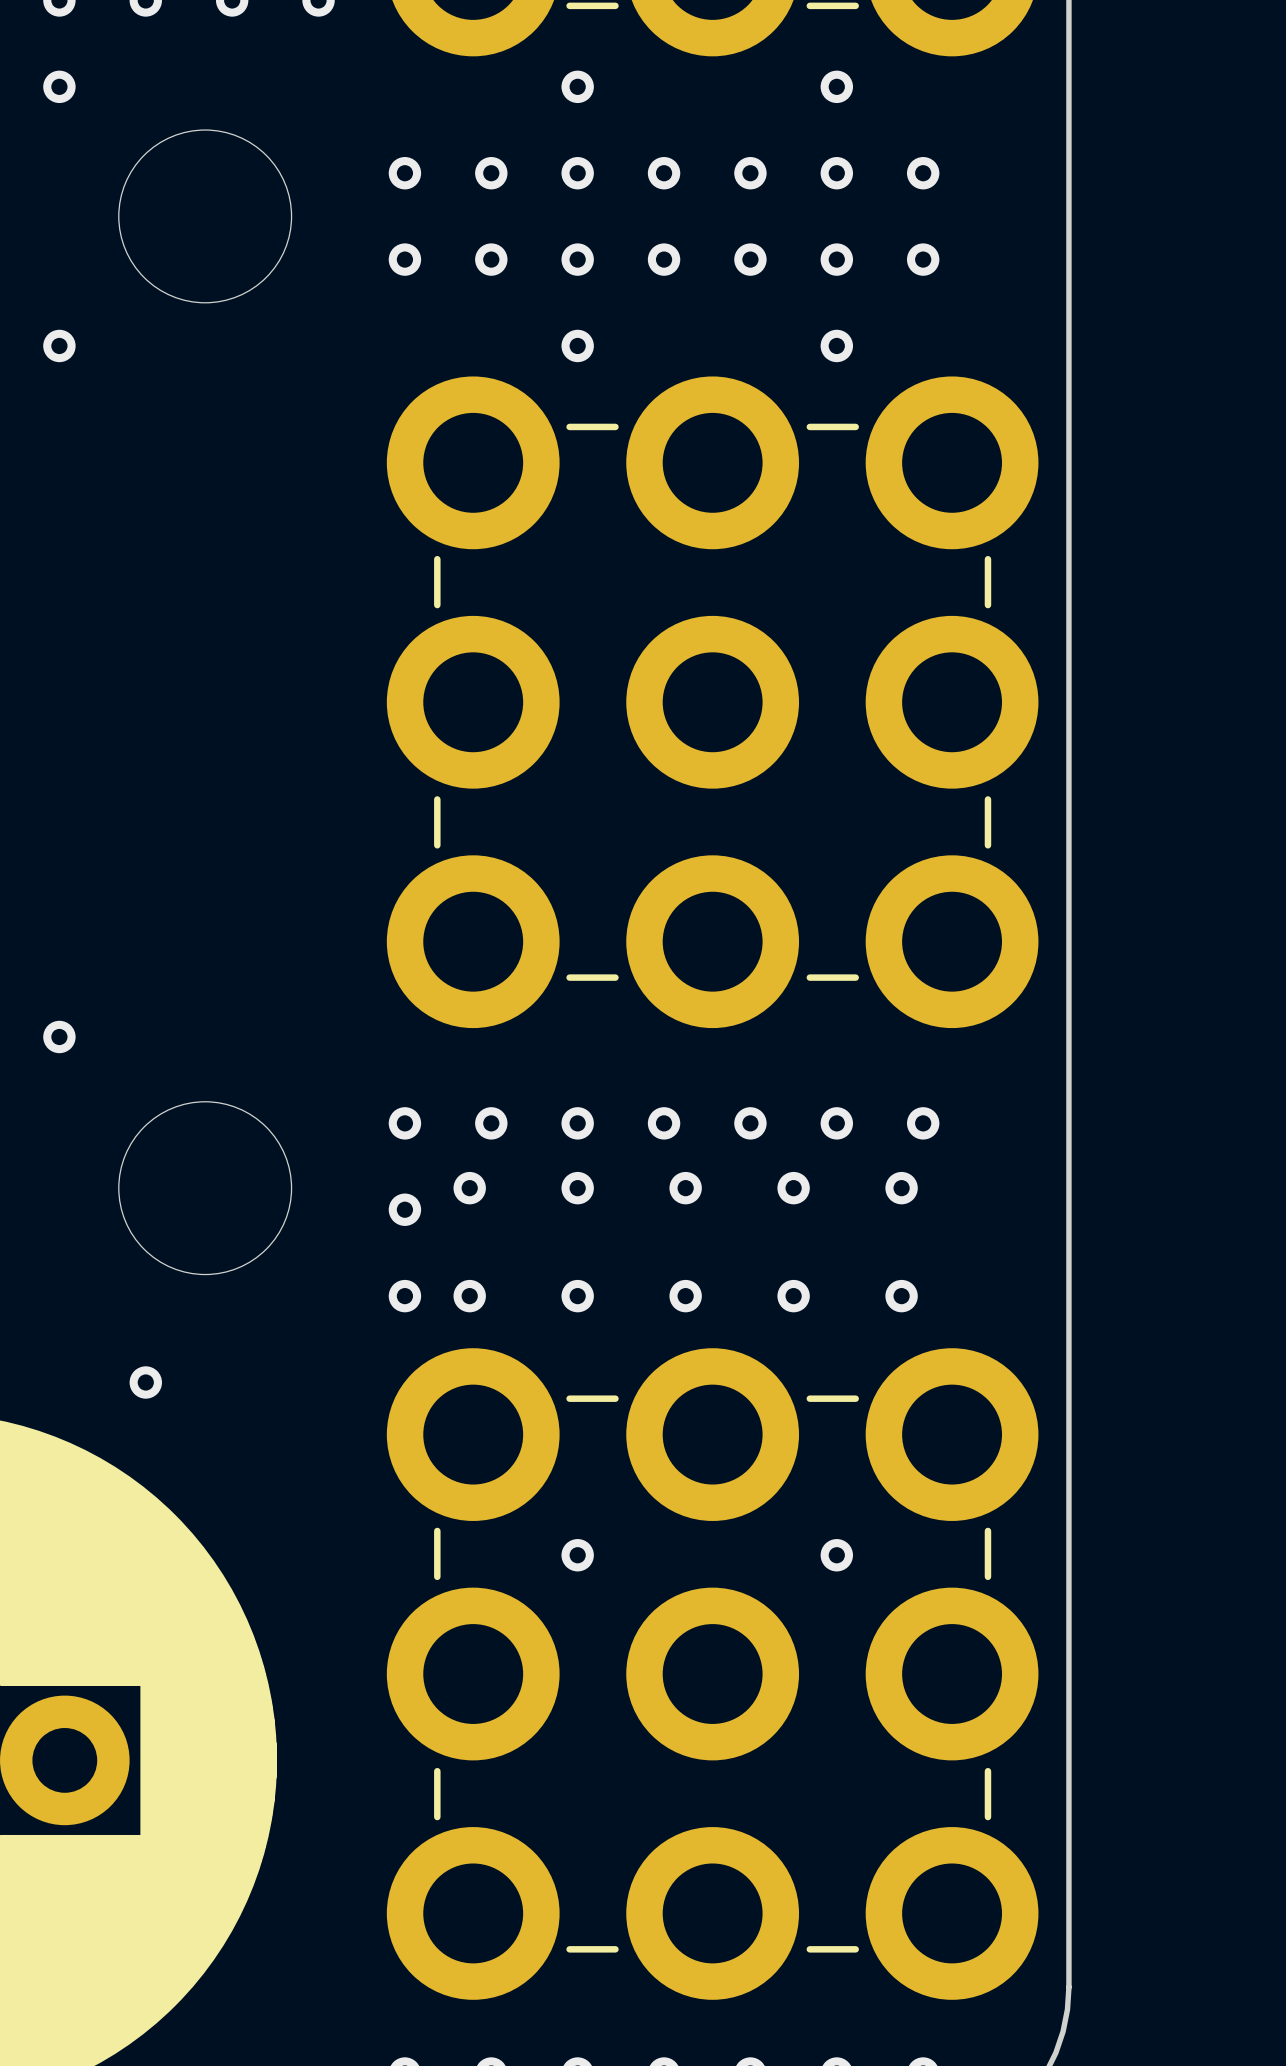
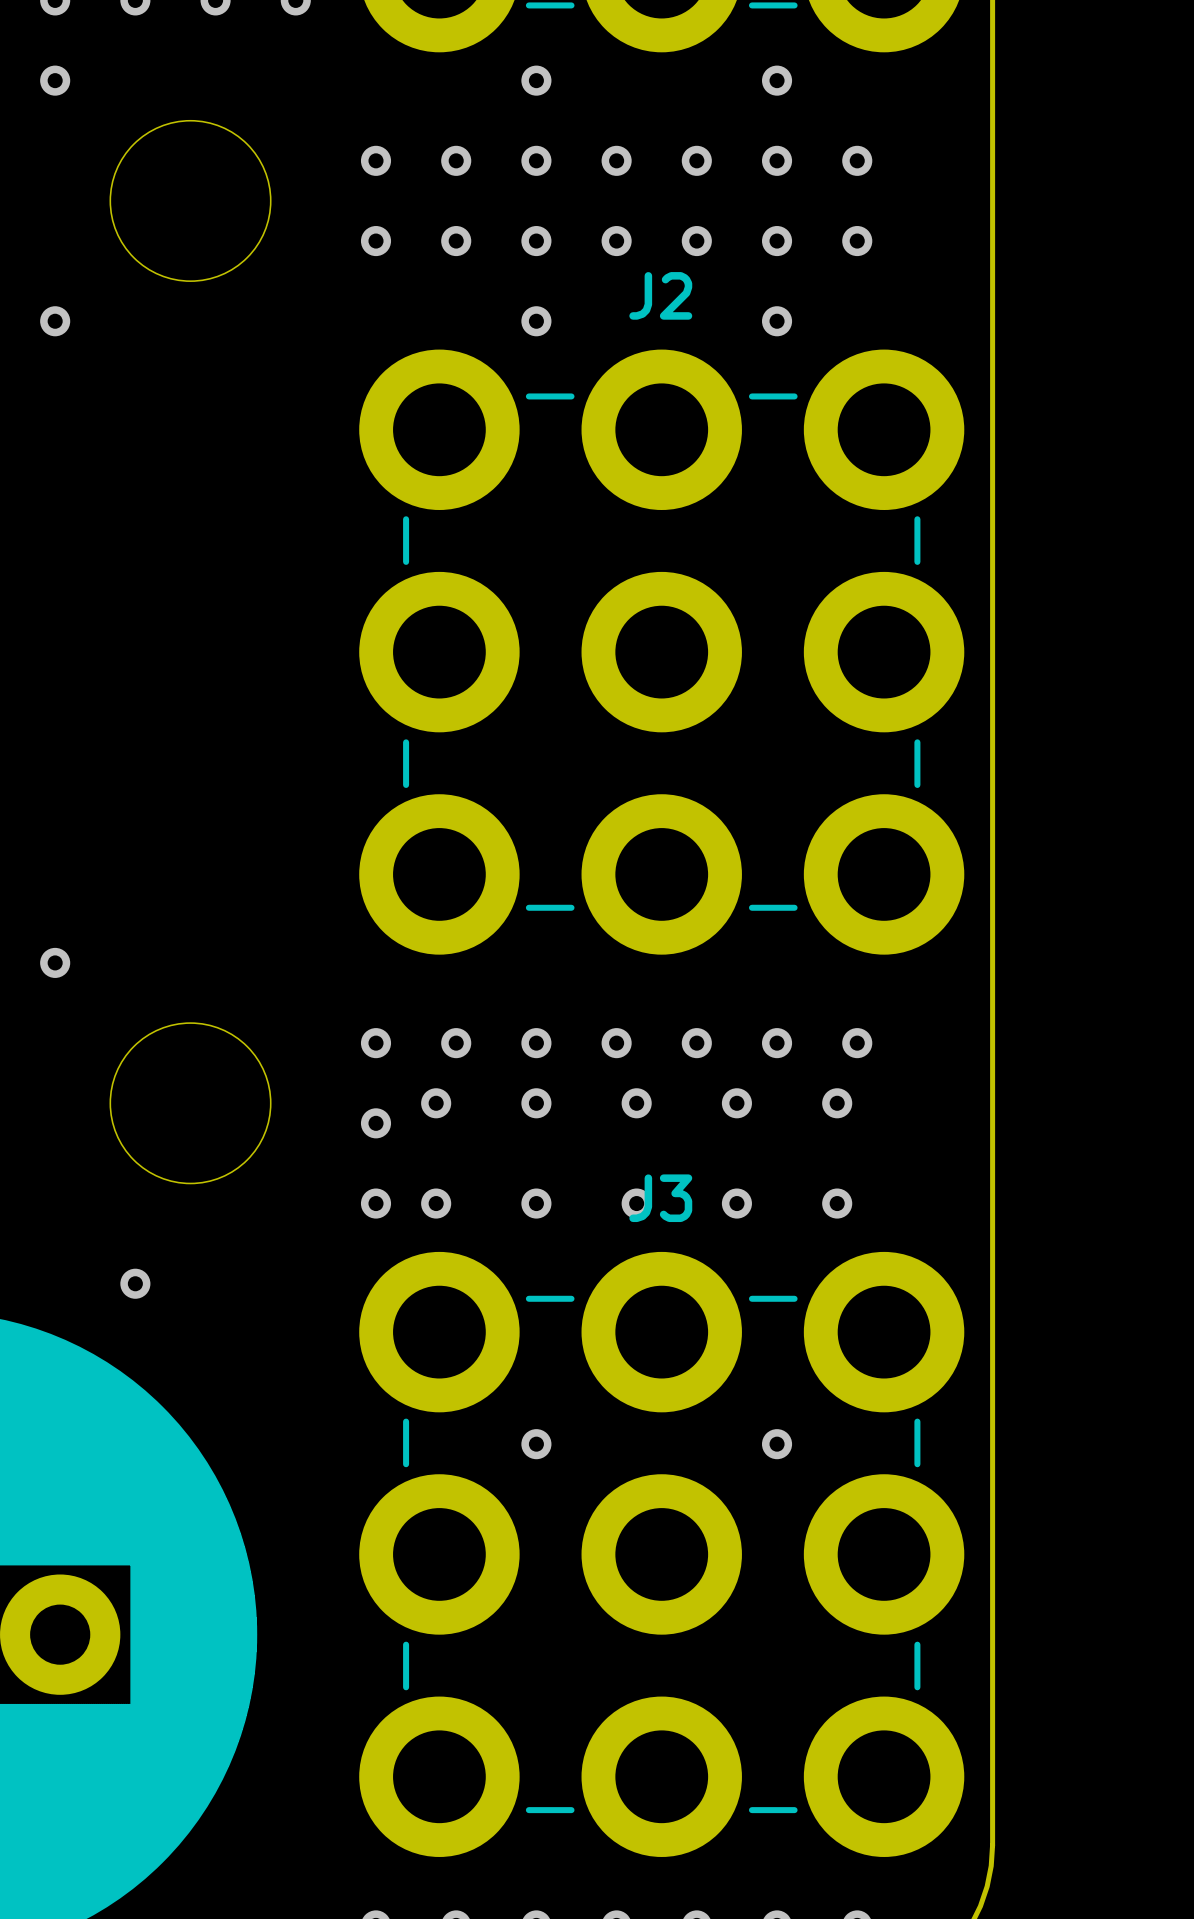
J2 name: none -> J2 (660, 295)
J3 name: none -> J3 (660, 1198)

